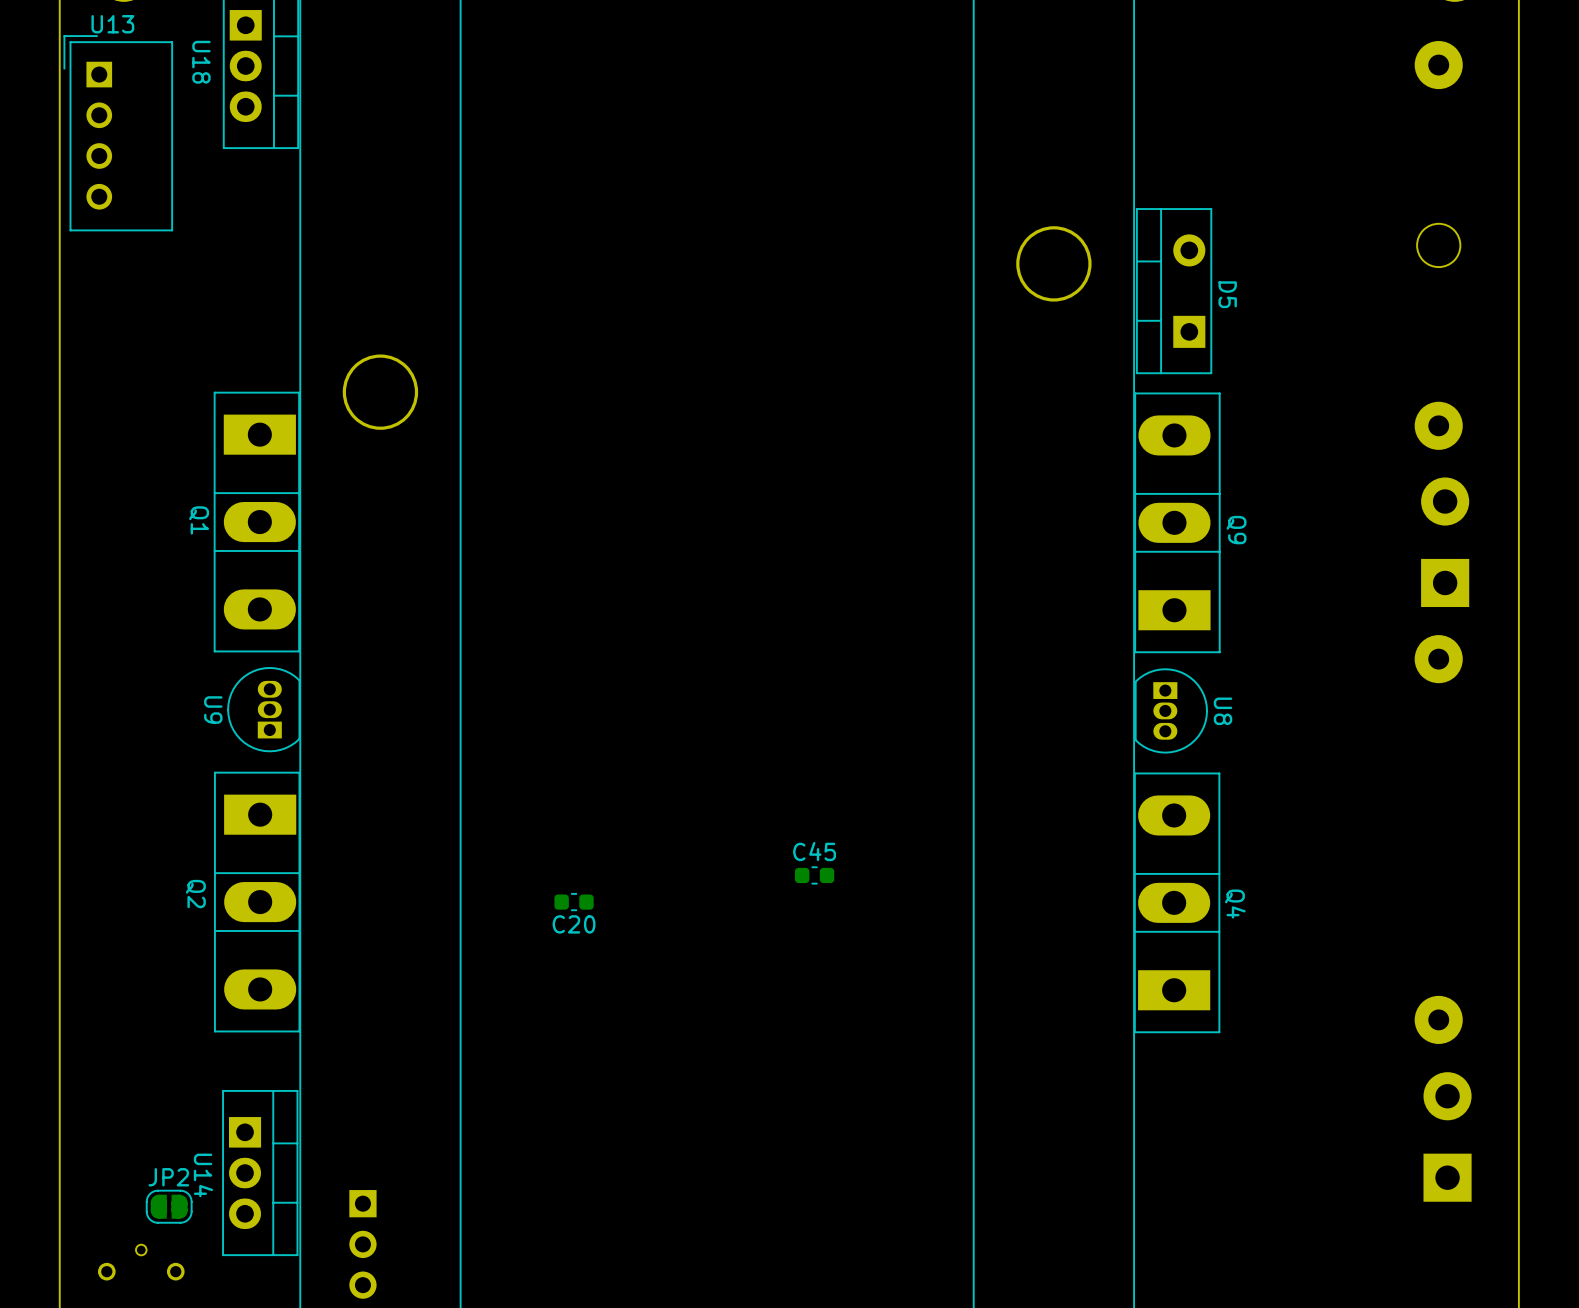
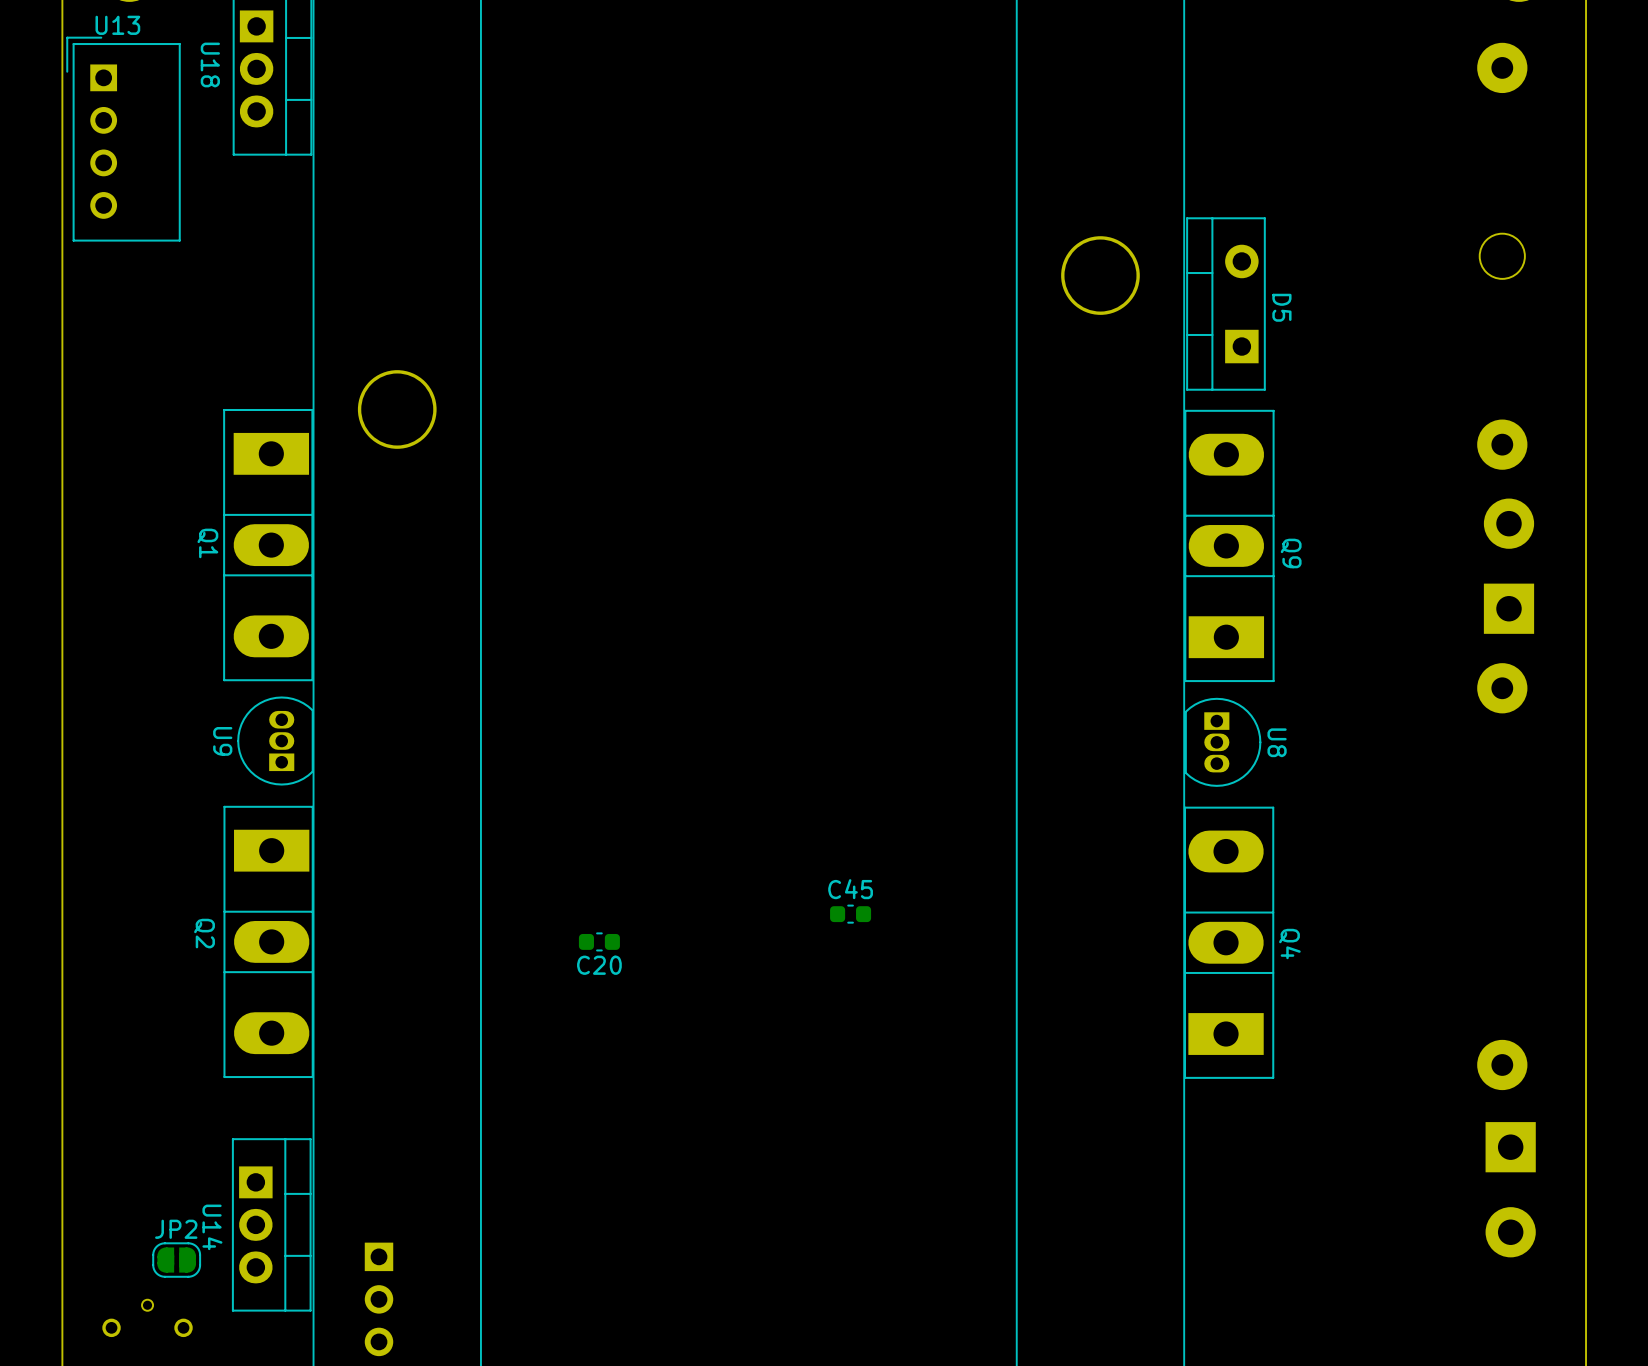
part rotation: 0° (1447, 1136) -> 180° (1510, 1189)

